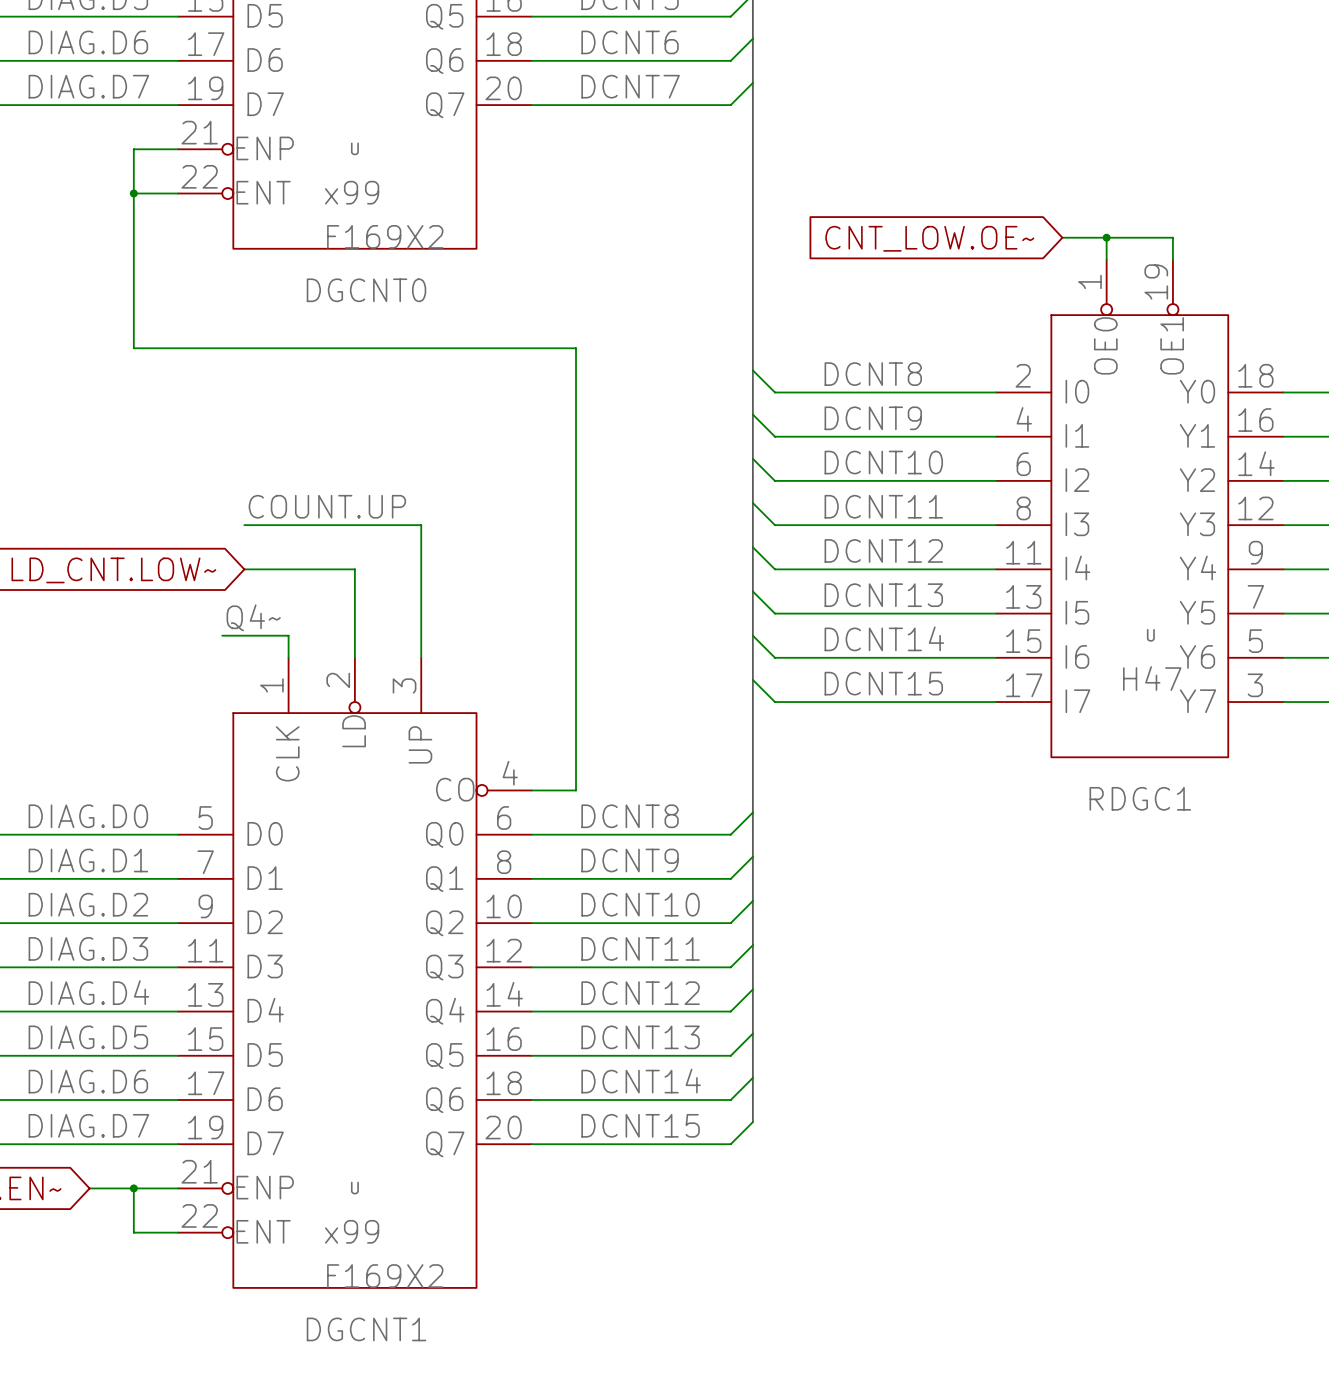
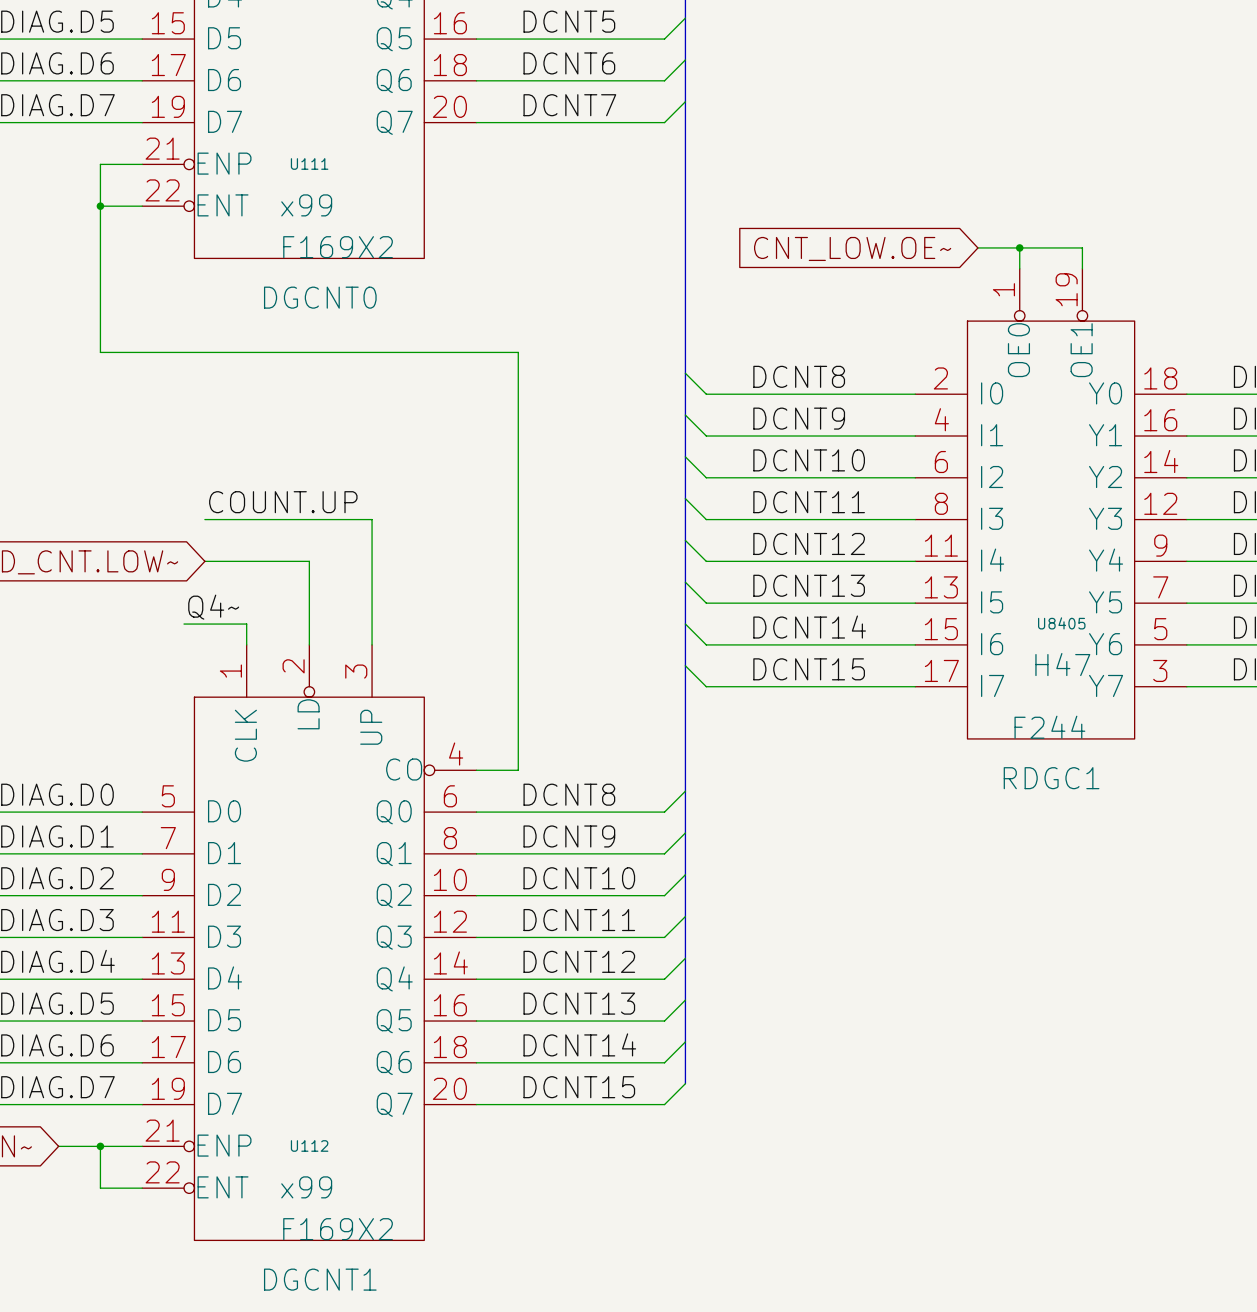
U name: U (354, 148) -> U111 (309, 164)
U name: U (1150, 635) -> U8405 (1061, 623)
U value: none -> F244 (1049, 727)
U name: U (354, 1188) -> U112 (309, 1145)

